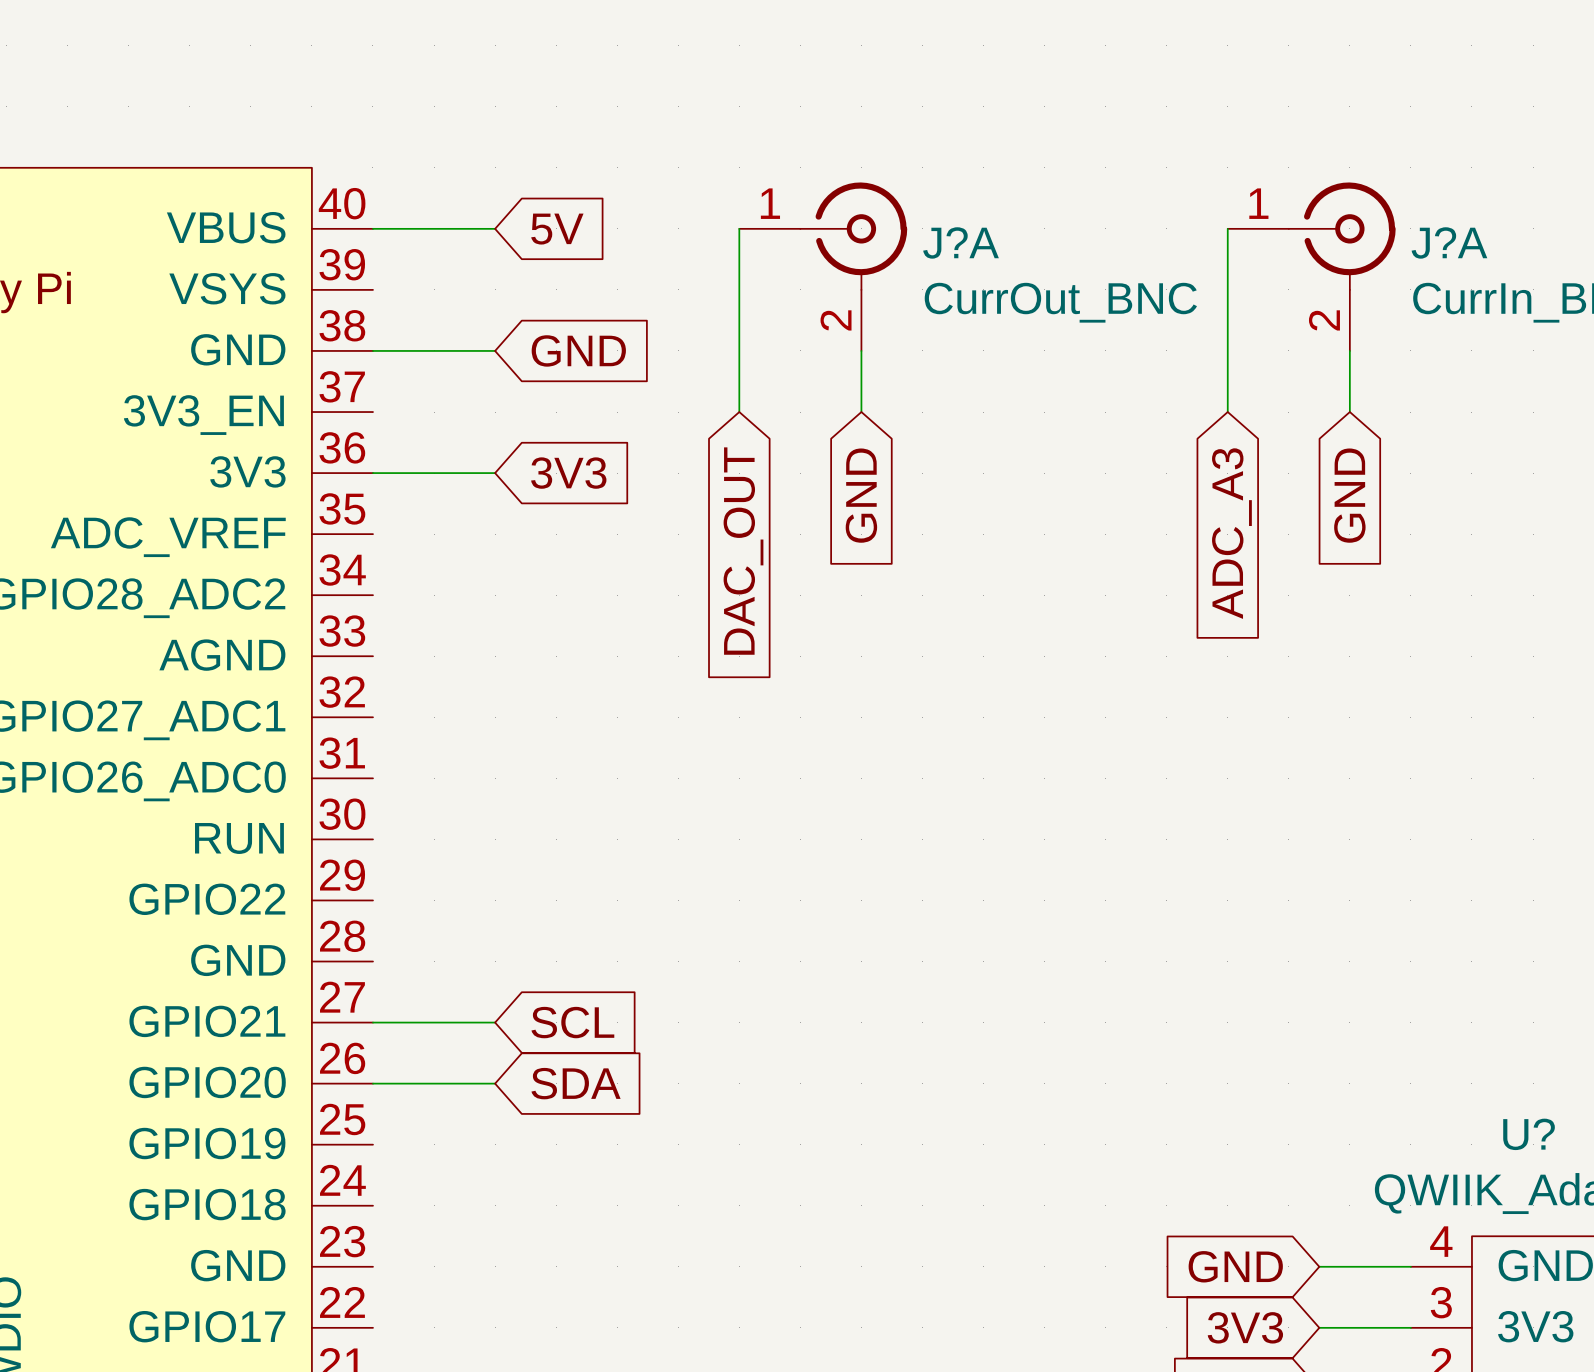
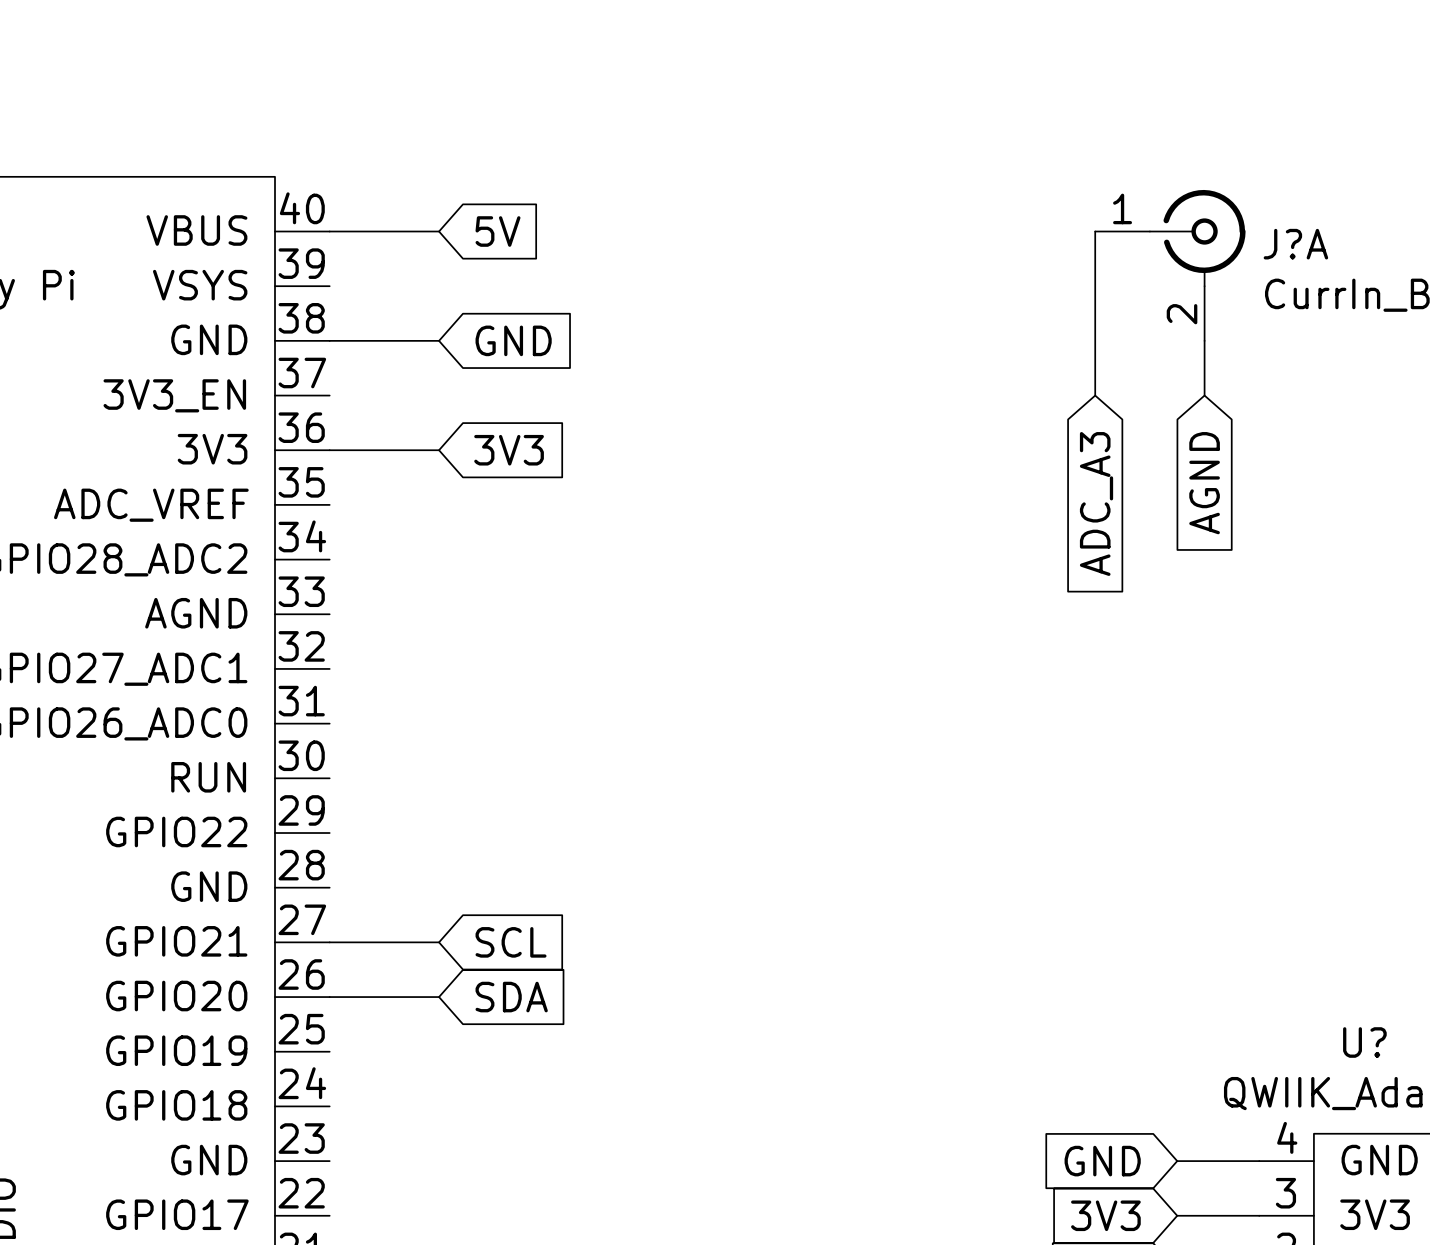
wire: (739, 228) (739, 412) -> none
J?A: CurrOut_BNC (823, 266) -> none
wire: (861, 350) (861, 412) -> none
global label: GND (861, 495) -> none
global label: GND (1349, 495) -> AGND (1204, 483)
global label: DAC_OUT (743, 551) -> none

